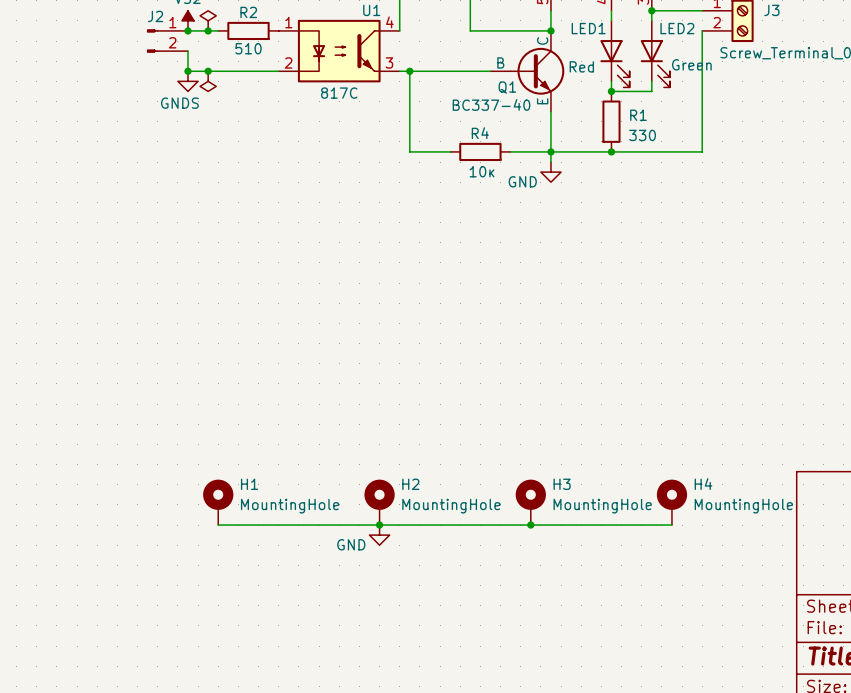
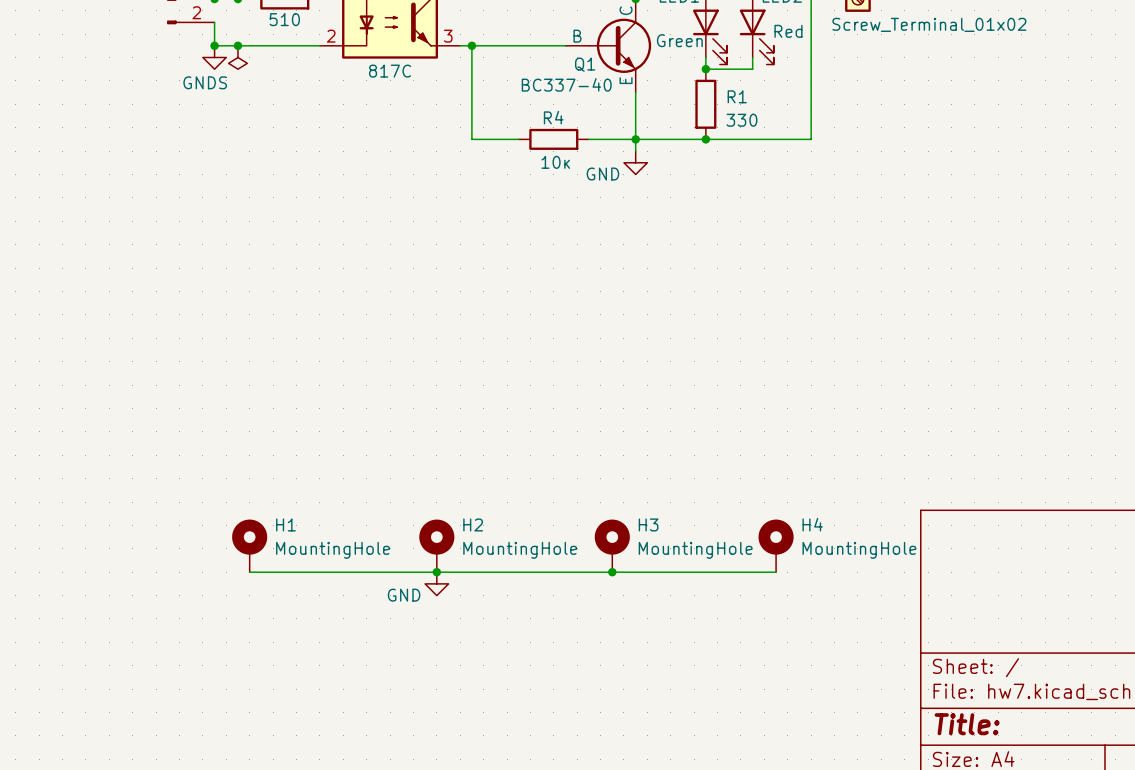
LED2 value position: Green (691, 64) -> Green (679, 40)
LED1 value position: Red (581, 66) -> Red (788, 31)

